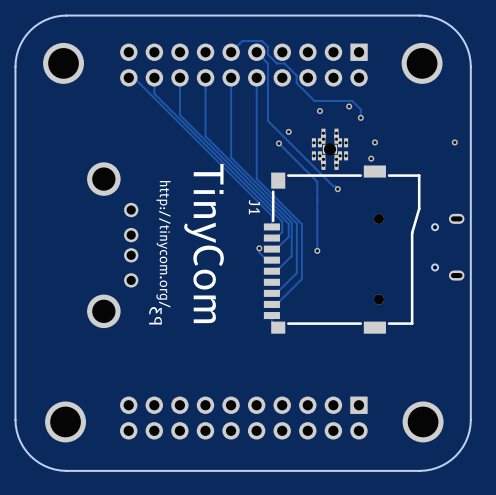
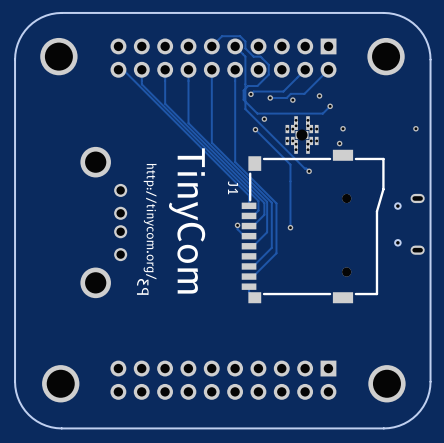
track: (293, 72) (296, 75) (296, 83) (314, 100) (352, 100) (360, 109) (360, 117) -> (268, 64) (268, 74) (257, 86) (248, 86) (243, 90) (243, 99) (257, 113) (322, 113) (330, 106)
track: none -> (305, 69) (283, 91) (253, 91) (250, 94)
track: none -> (328, 69) (304, 93) (290, 93) (286, 97) (270, 97)
via: none -> (250, 94)
via: none -> (270, 97)

